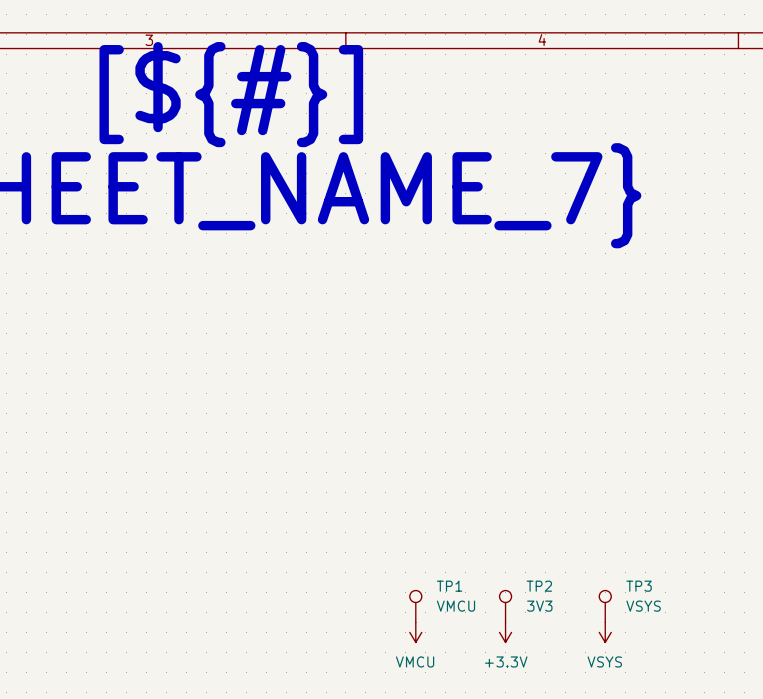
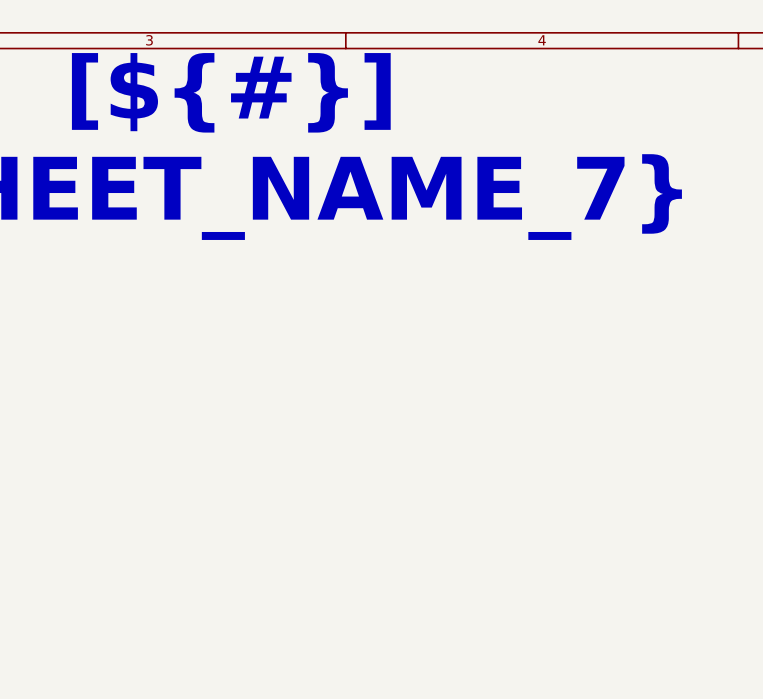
TP1: VMCU (415, 606) -> none
TP2: 3V3 (505, 606) -> none
TP3: VSYS (605, 606) -> none
power symbol: VMCU (415, 632) -> none
power symbol: +3.3V (505, 632) -> none
power symbol: VSYS (605, 632) -> none

